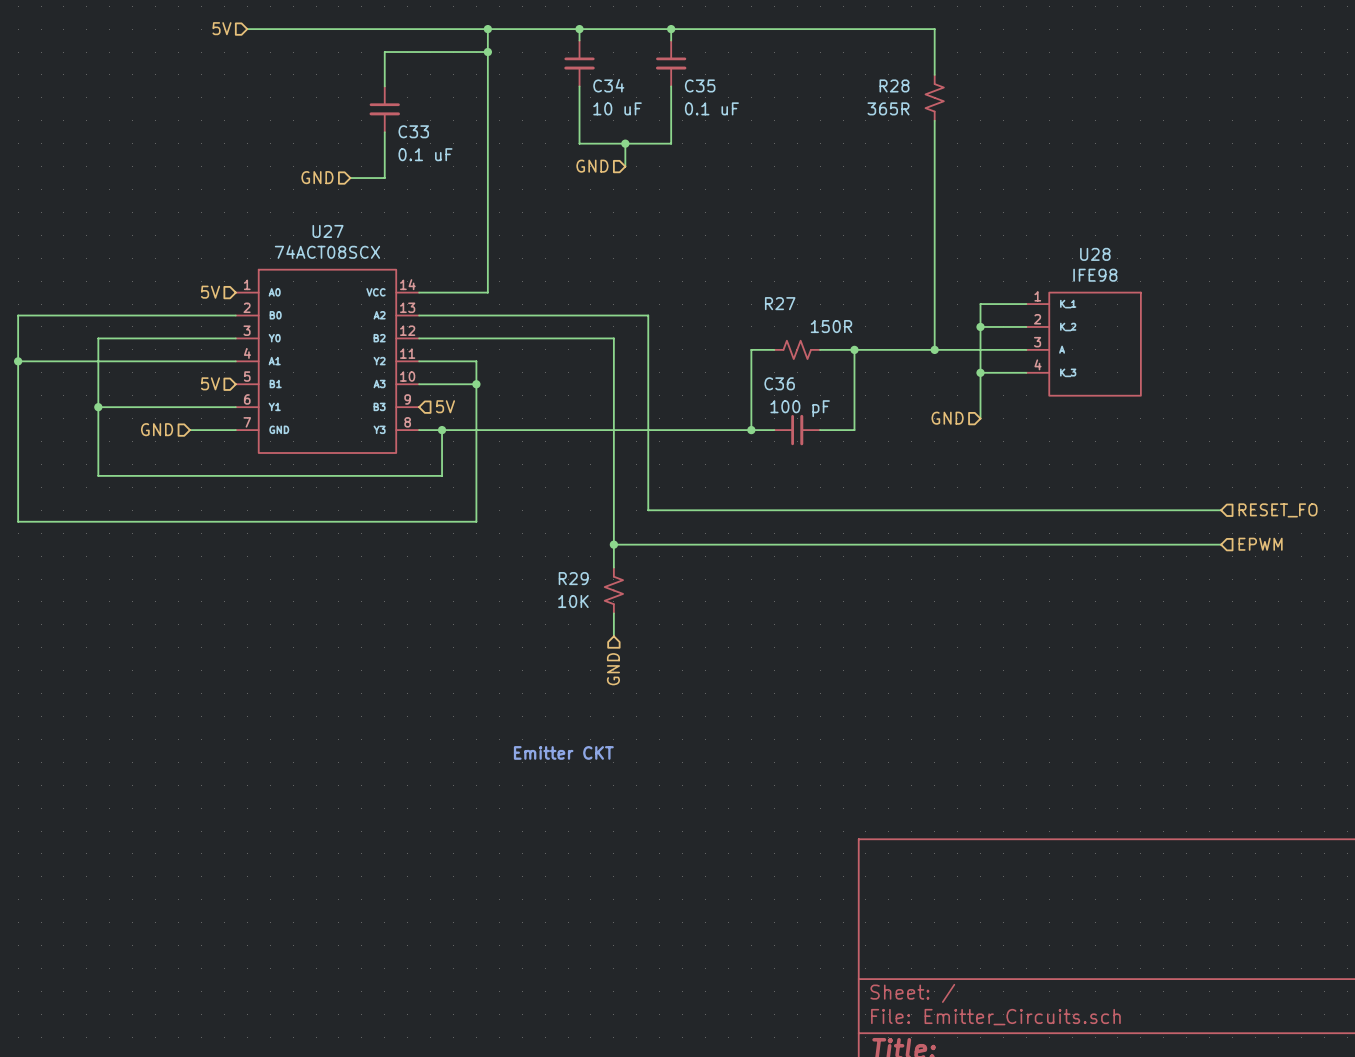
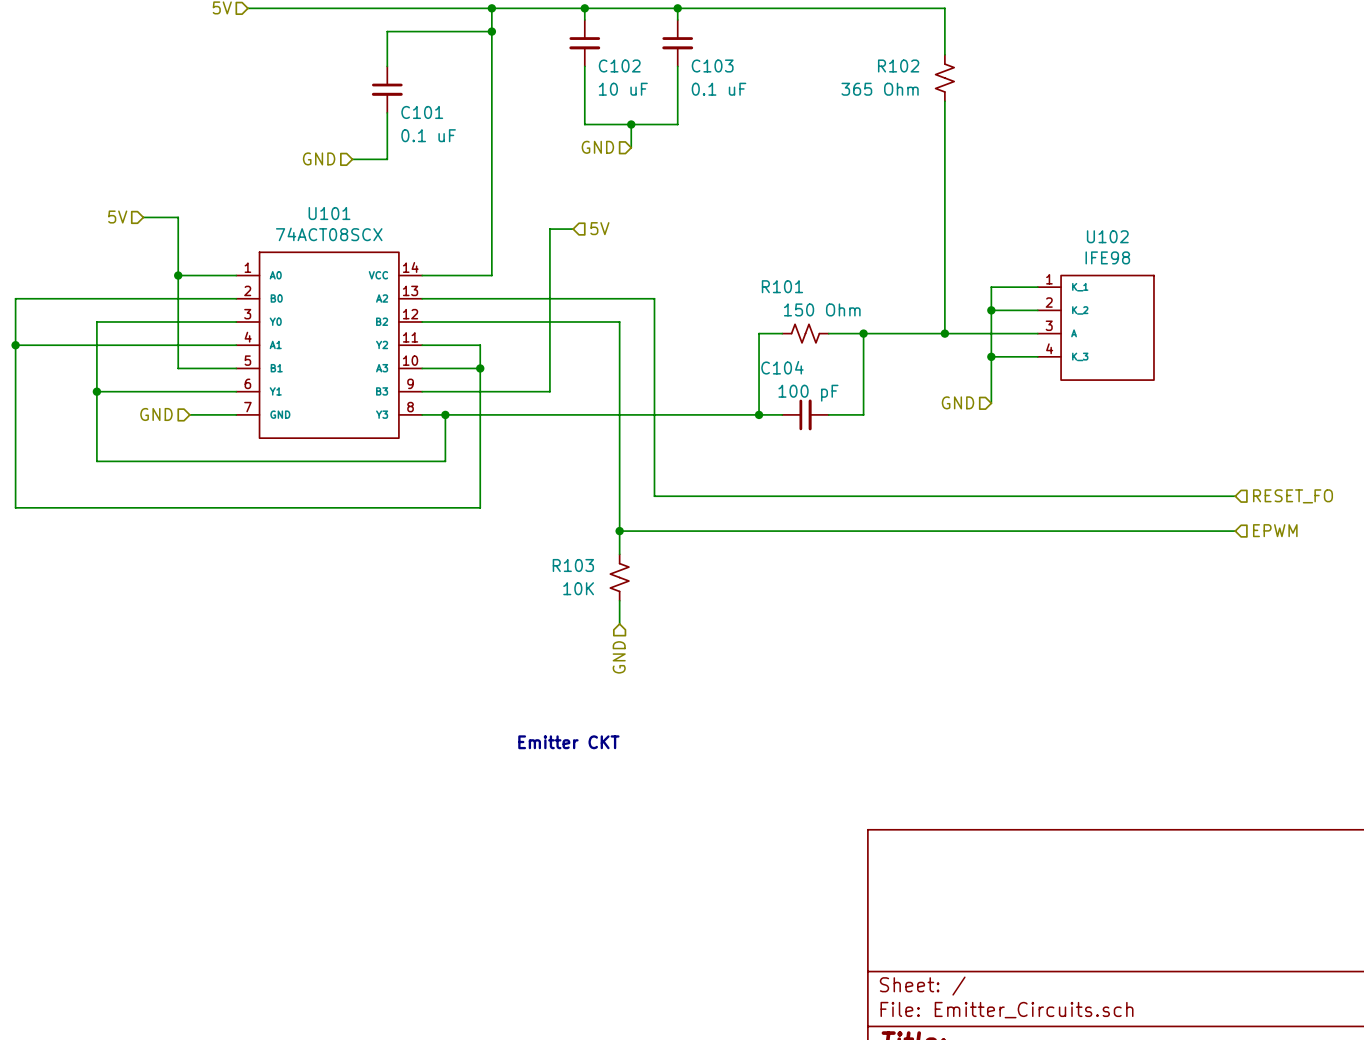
C34 name: C34 (608, 85) -> C102 (619, 66)
C35 name: C35 (700, 85) -> C103 (712, 66)
R28 name: R28 (894, 85) -> R102 (898, 66)
R28 value: 365R (888, 108) -> 365 Ohm (880, 89)
C33 name: C33 (413, 131) -> C101 (422, 112)
U27 name: U27 (328, 231) -> U101 (329, 213)
hierarchical label: none -> 5V (117, 217)
wire: none -> (143, 217) (178, 217) (178, 368) (236, 368)
wire: none -> (573, 229) (549, 229) (549, 391) (422, 391)
hierarchical label: none -> 5V (599, 228)
U28 name: U28 (1095, 254) -> U102 (1107, 236)
wire: none -> (178, 275) (236, 275)
junction: none -> (178, 275)
hierarchical label: 5V (210, 292) -> none
R27 name: R27 (780, 303) -> R101 (782, 286)
R27 value: 150R (831, 326) -> 150 Ohm (822, 309)
hierarchical label: 5V (210, 383) -> none
C36 name: C36 (779, 383) -> C104 (782, 367)
hierarchical label: 5V (445, 406) -> none
R29 name: R29 (573, 578) -> R103 (573, 565)

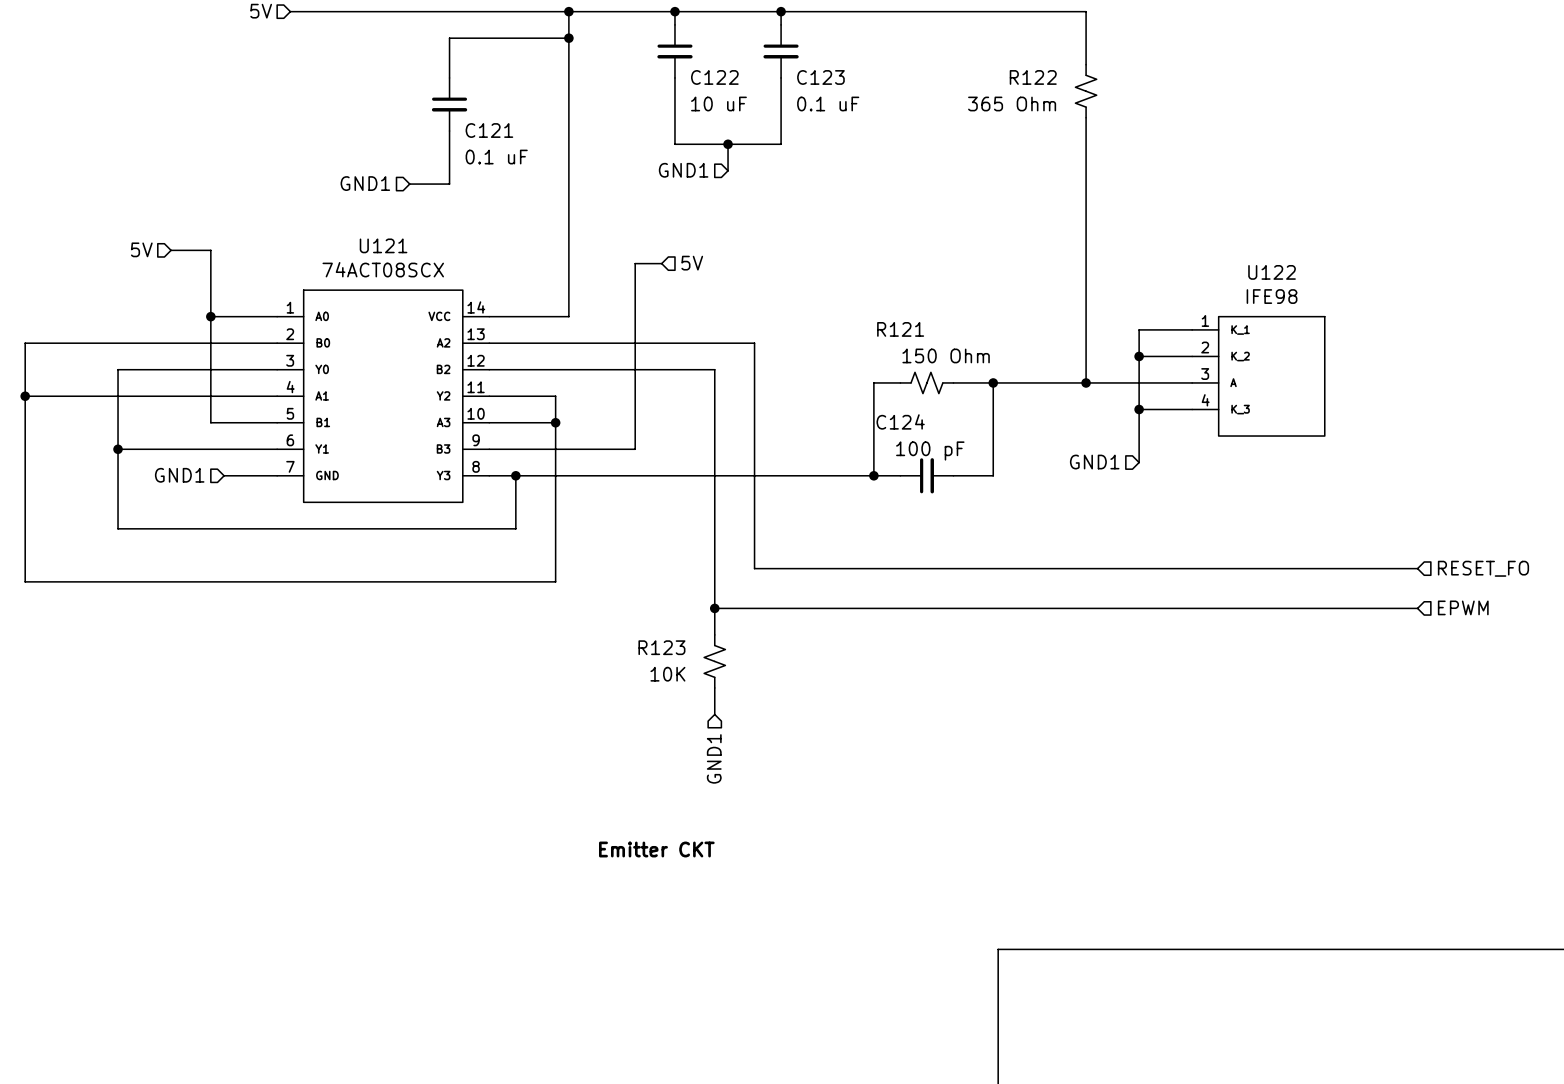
C102 name: C102 (619, 66) -> C122 (714, 77)
C103 name: C103 (712, 66) -> C123 (820, 77)
R102 name: R102 (898, 66) -> R122 (1033, 77)
C101 name: C101 (422, 112) -> C121 (489, 130)
hierarchical label: GND (597, 147) -> GND1 (683, 170)
hierarchical label: GND (319, 158) -> GND1 (365, 183)
U101 name: U101 (329, 213) -> U121 (383, 245)
U102 name: U102 (1107, 236) -> U122 (1272, 272)
R101 name: R101 (782, 286) -> R121 (900, 329)
C104 name: C104 (782, 367) -> C124 (900, 421)
hierarchical label: GND (957, 402) -> GND1 (1094, 462)
hierarchical label: GND (156, 414) -> GND1 (179, 475)
R103 name: R103 (573, 565) -> R123 (661, 647)
hierarchical label: GND (619, 657) -> GND1 (714, 758)

